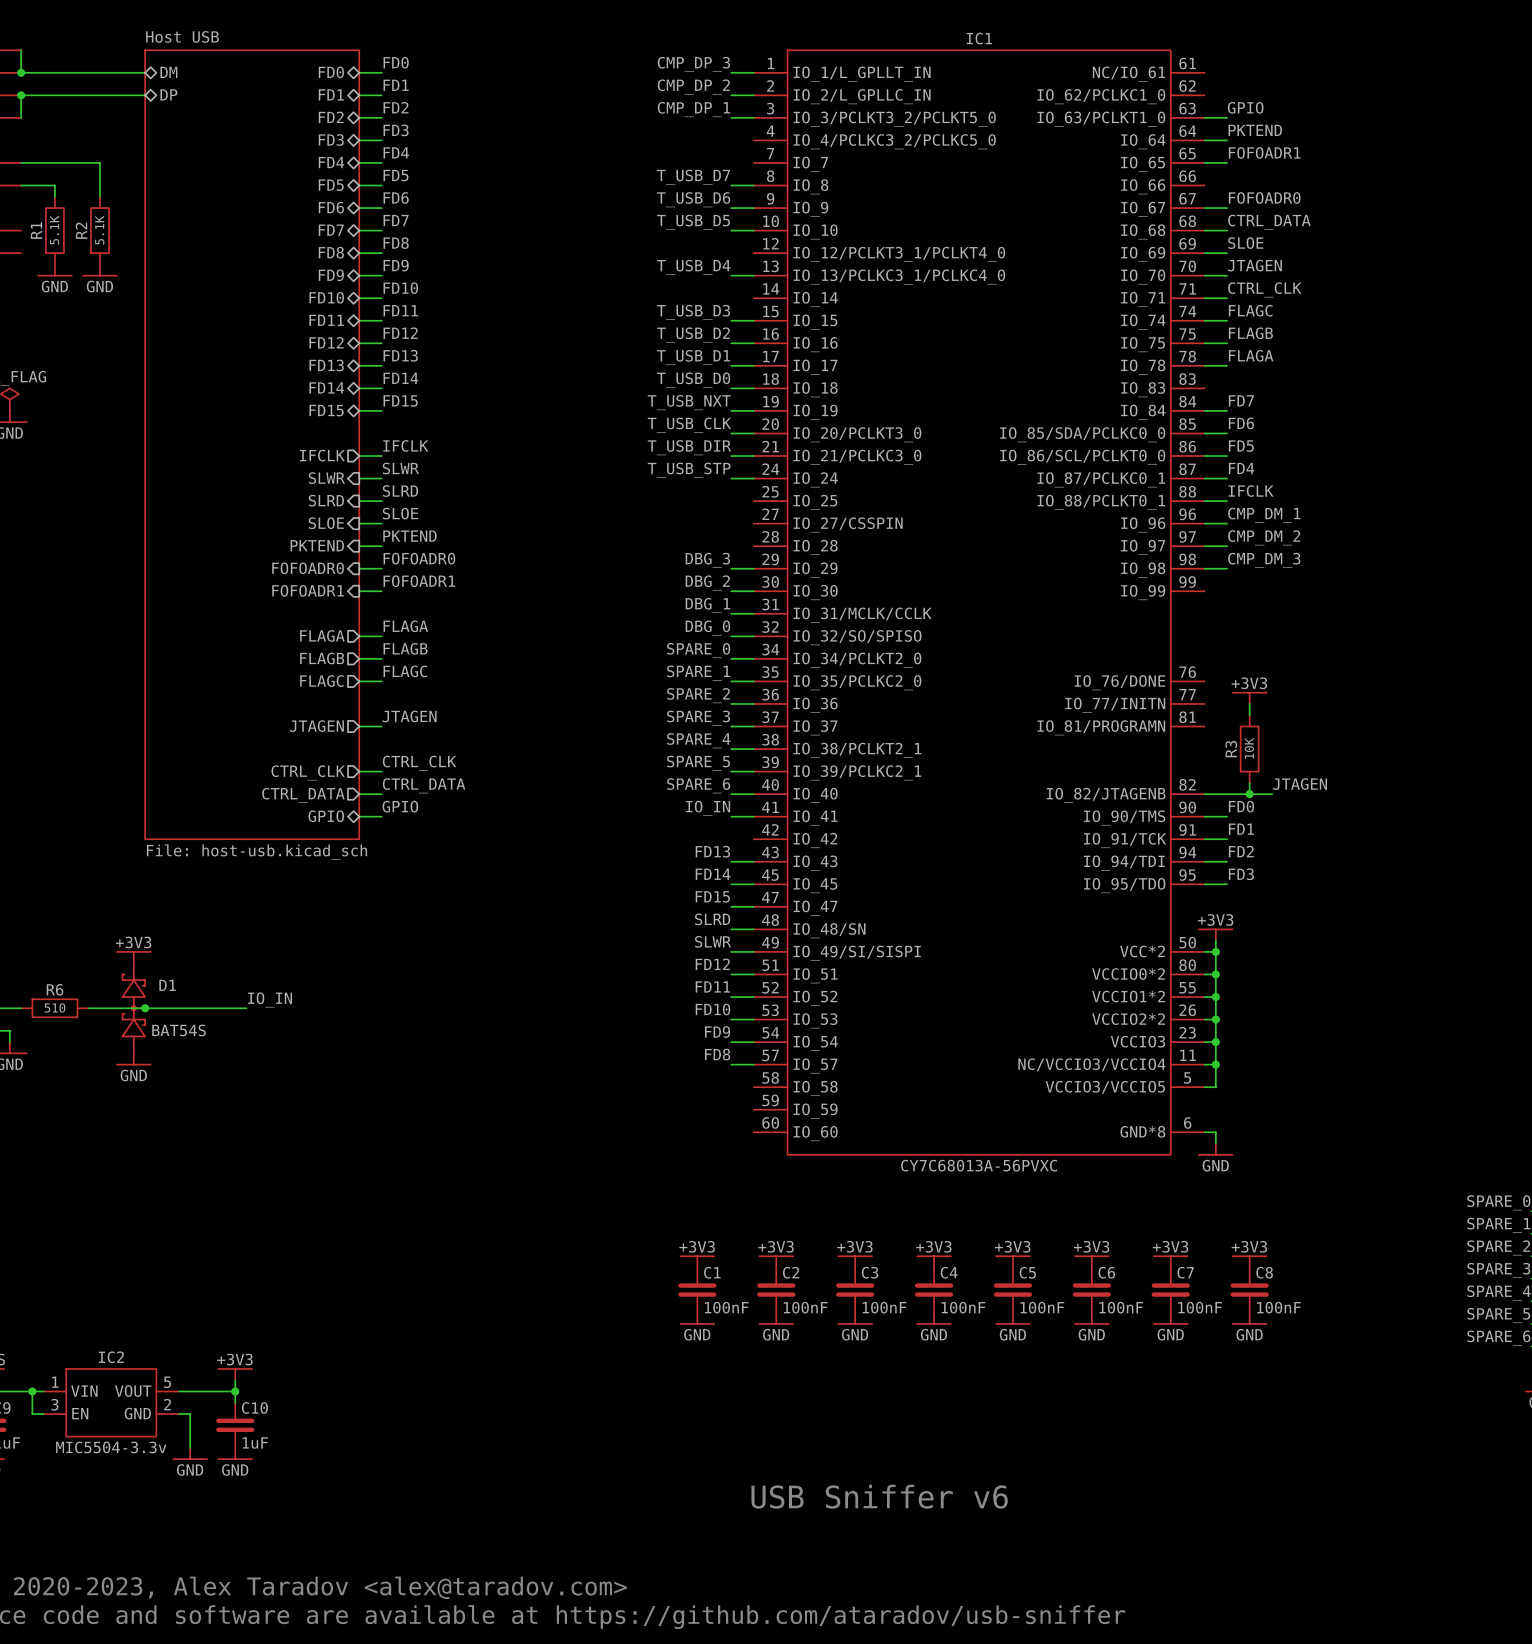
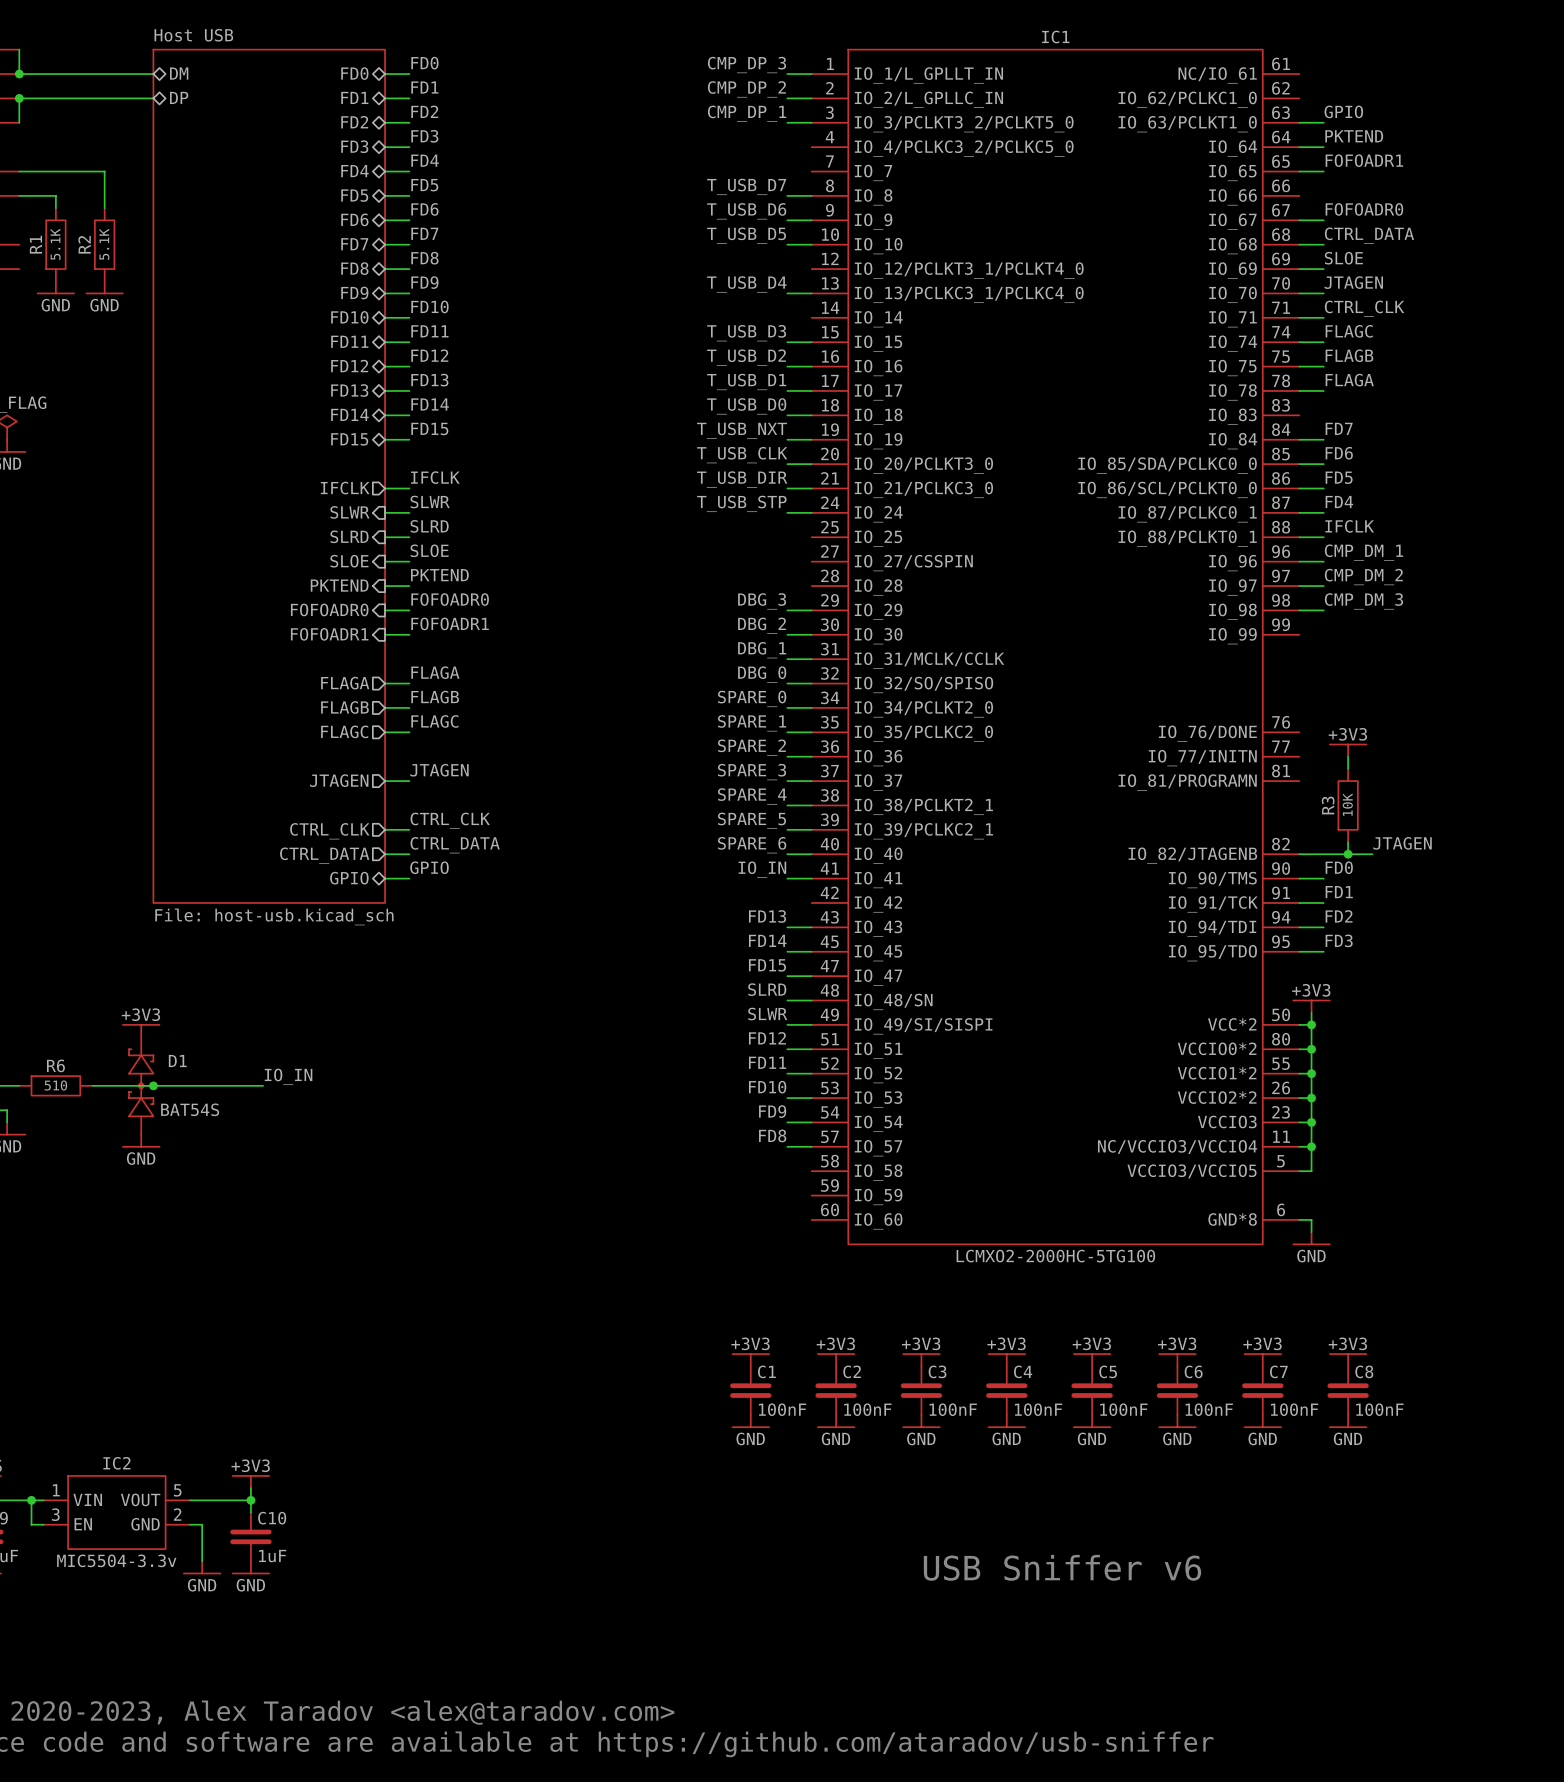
IC1 value: CY7C68013A-56PVXC (979, 1165) -> LCMXO2-2000HC-5TG100 (1055, 1256)
text position: USB Sniffer v6 (879, 1496) -> USB Sniffer v6 (1062, 1567)

